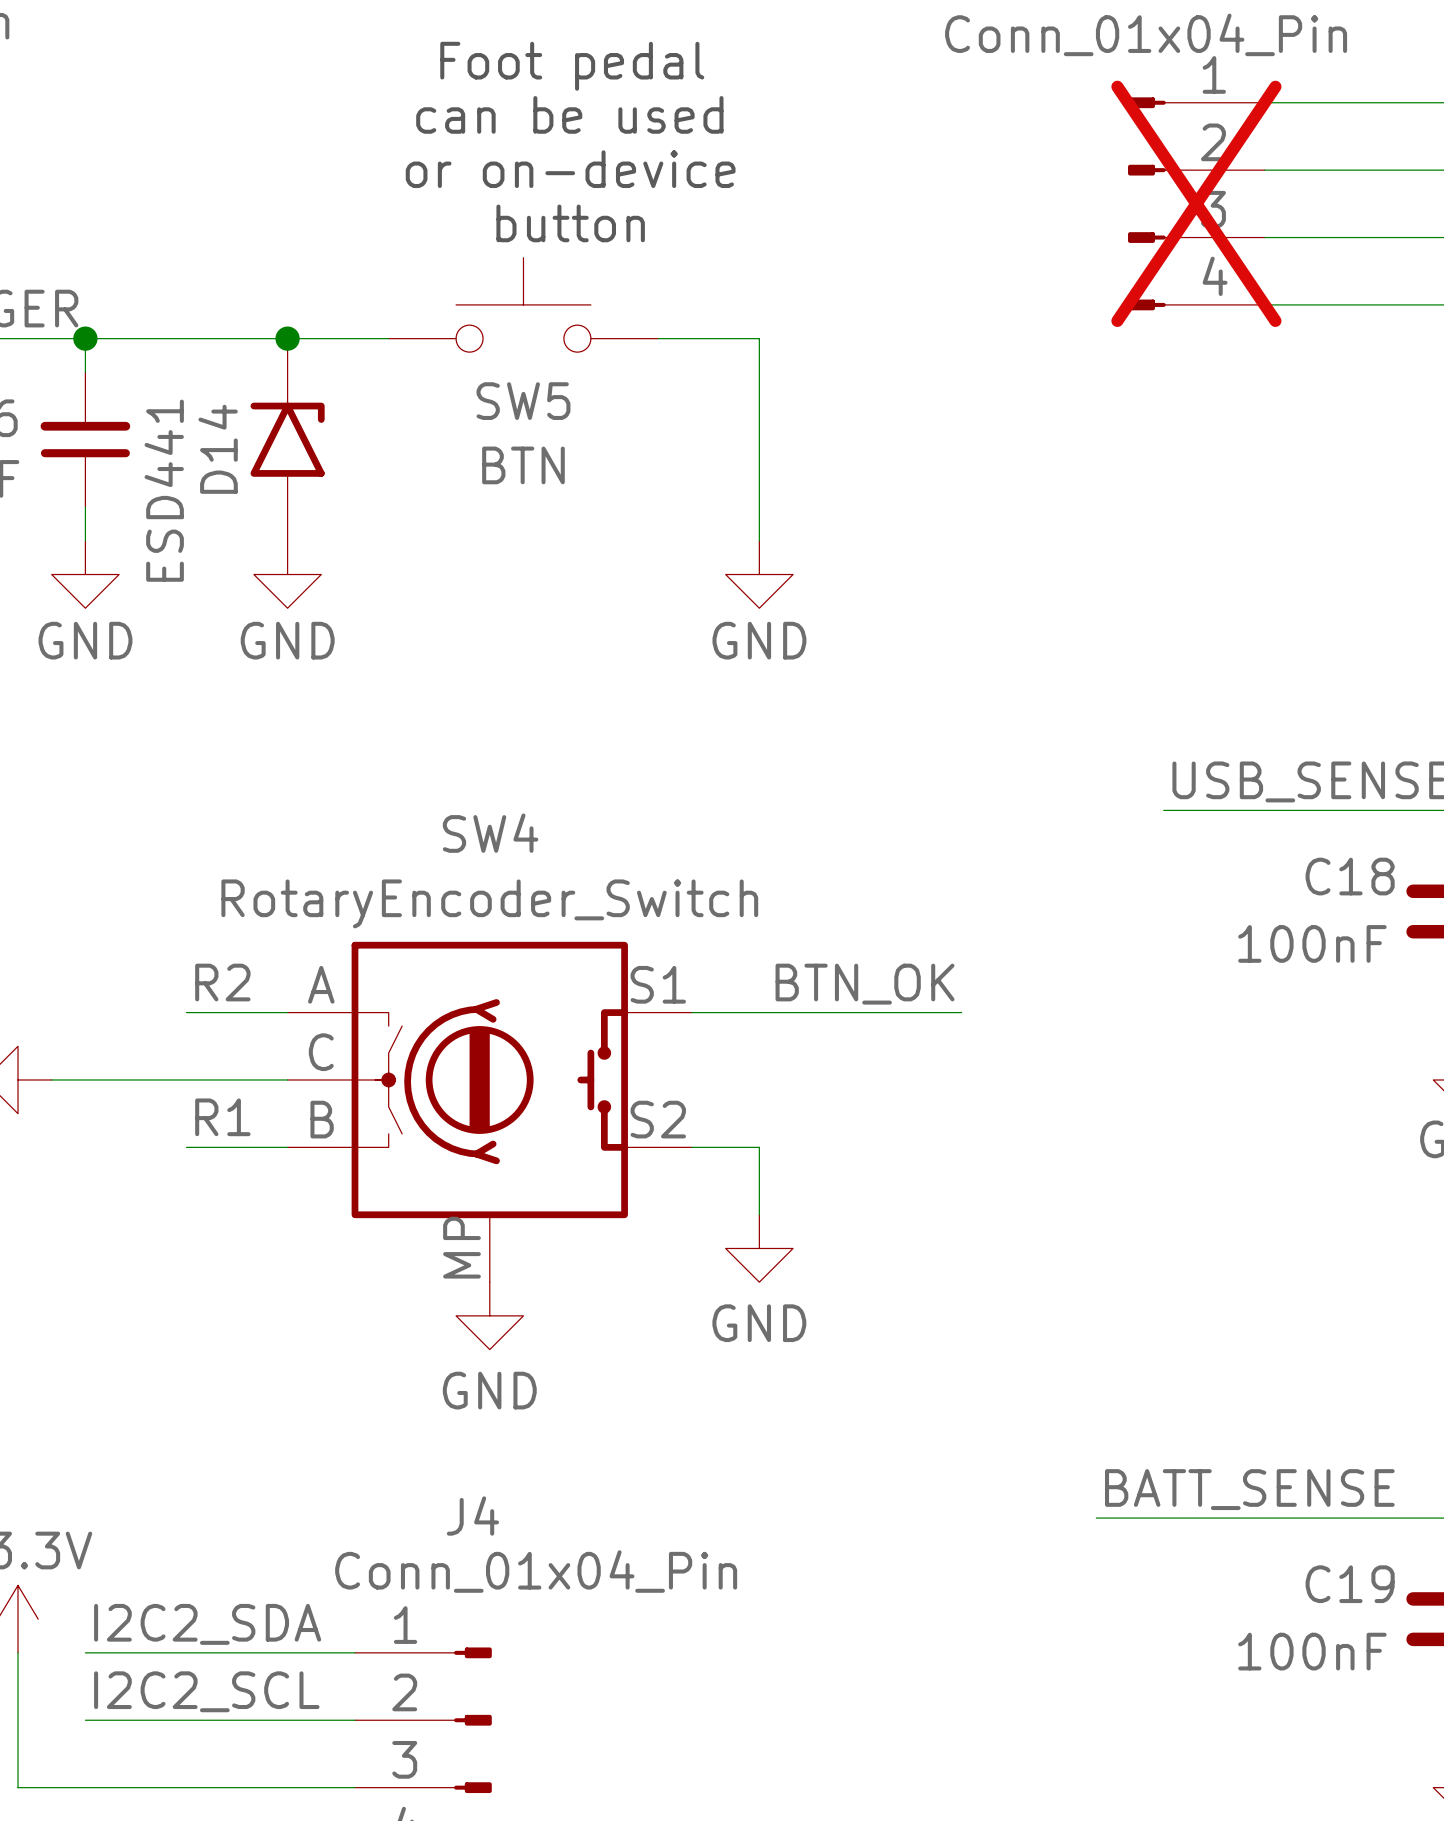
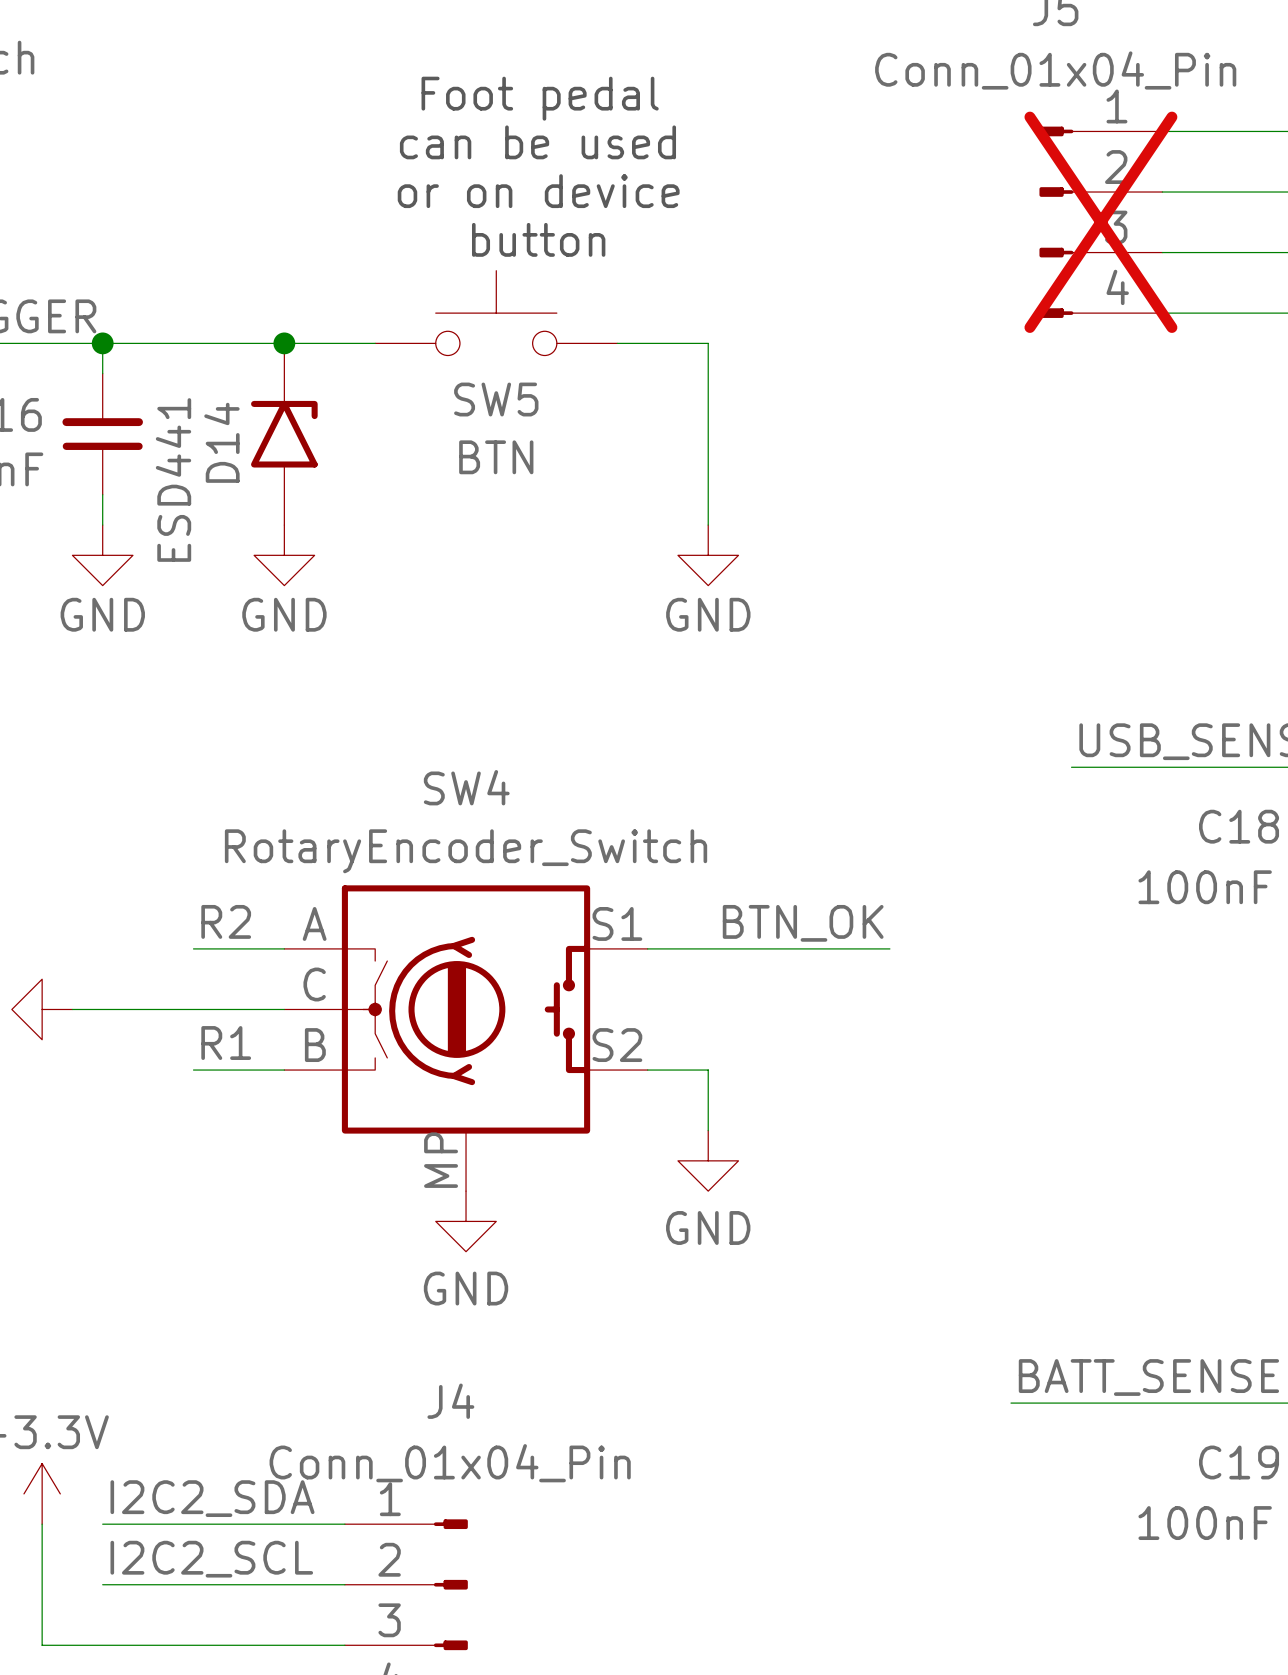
text: or on-device (570, 169) -> or on device (538, 191)
J4 value position: Conn_01x04_Pin (536, 1571) -> Conn_01x04_Pin (450, 1463)

